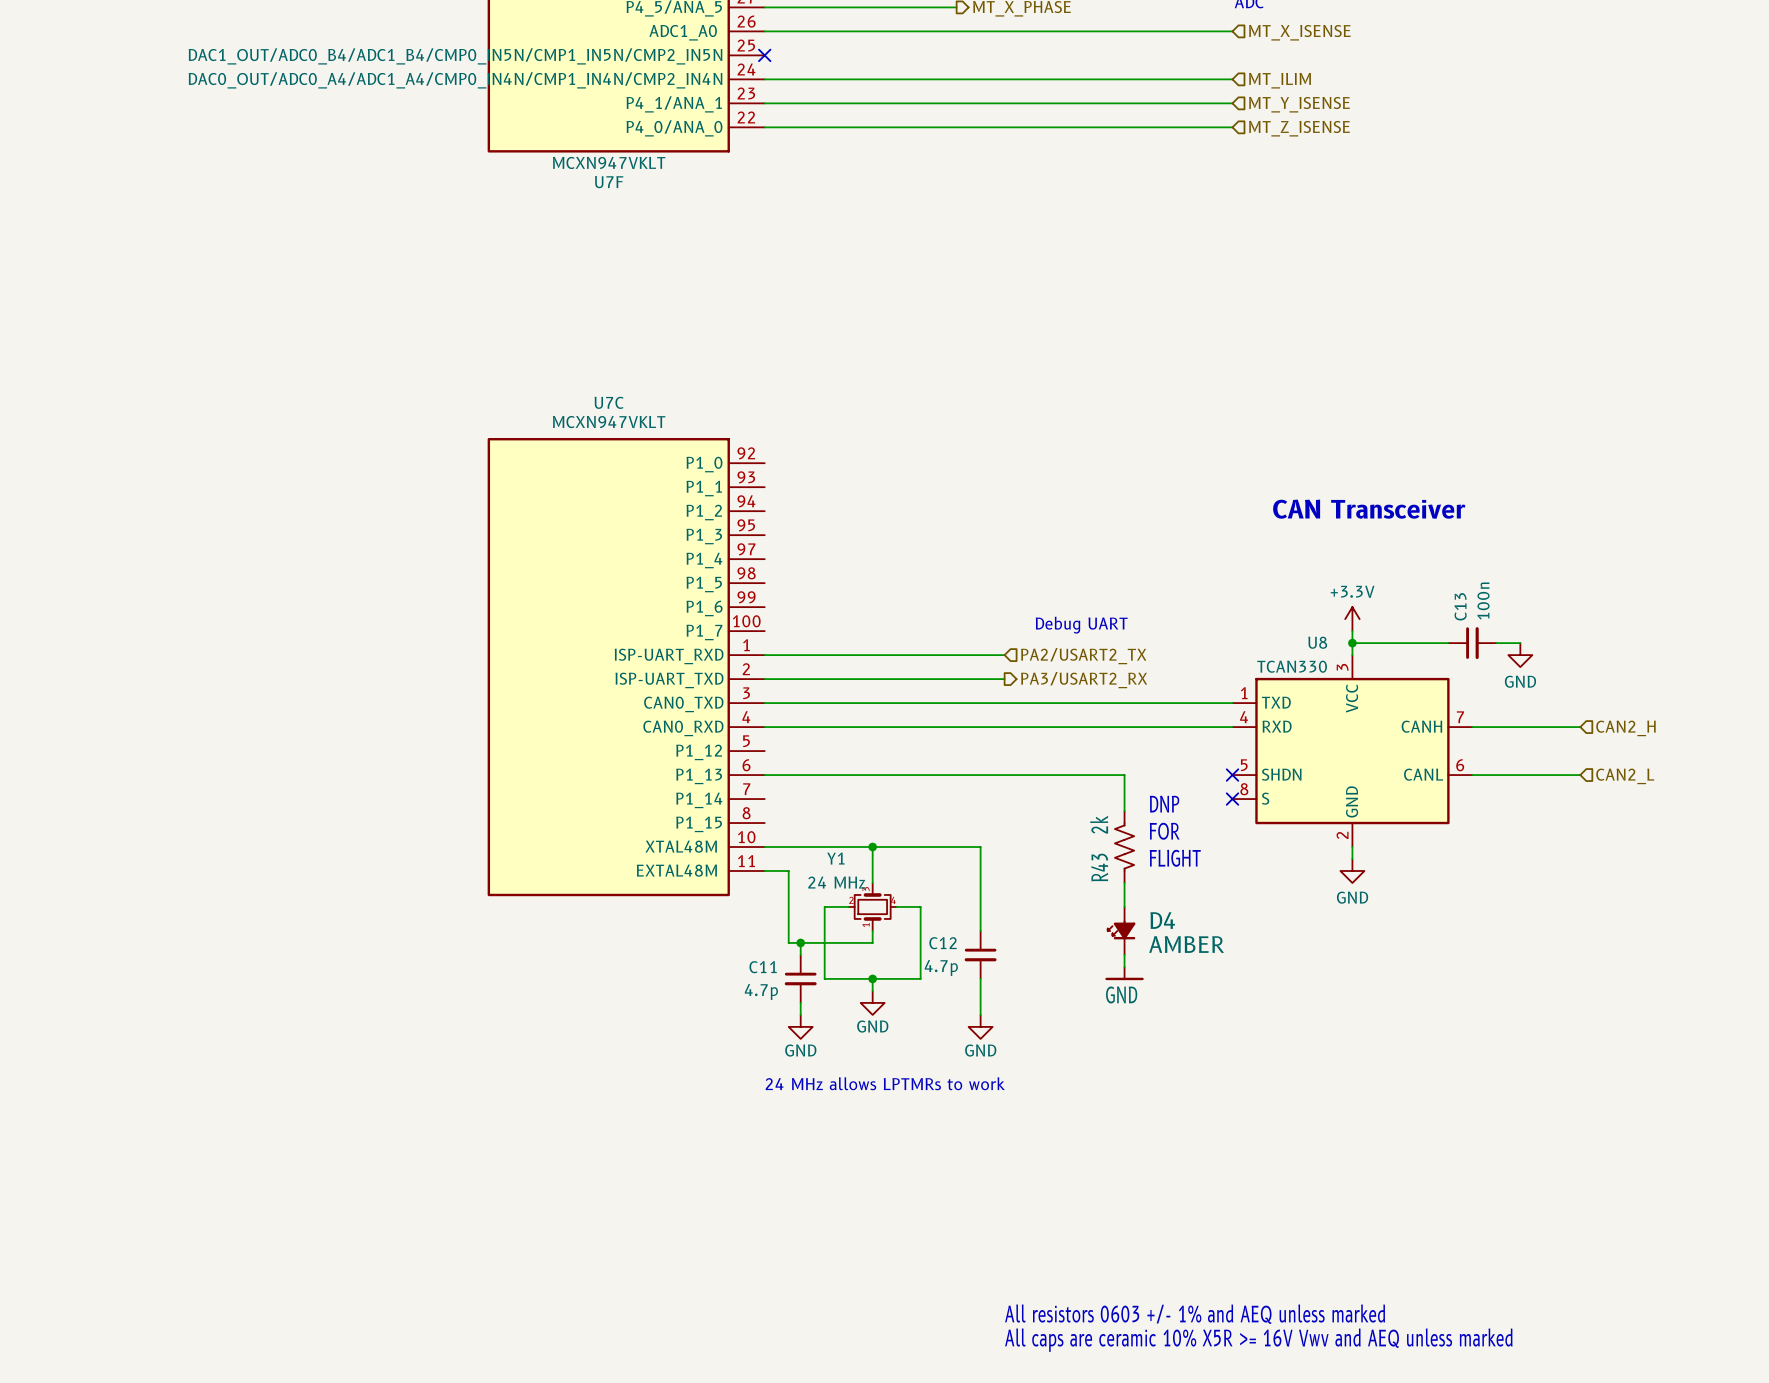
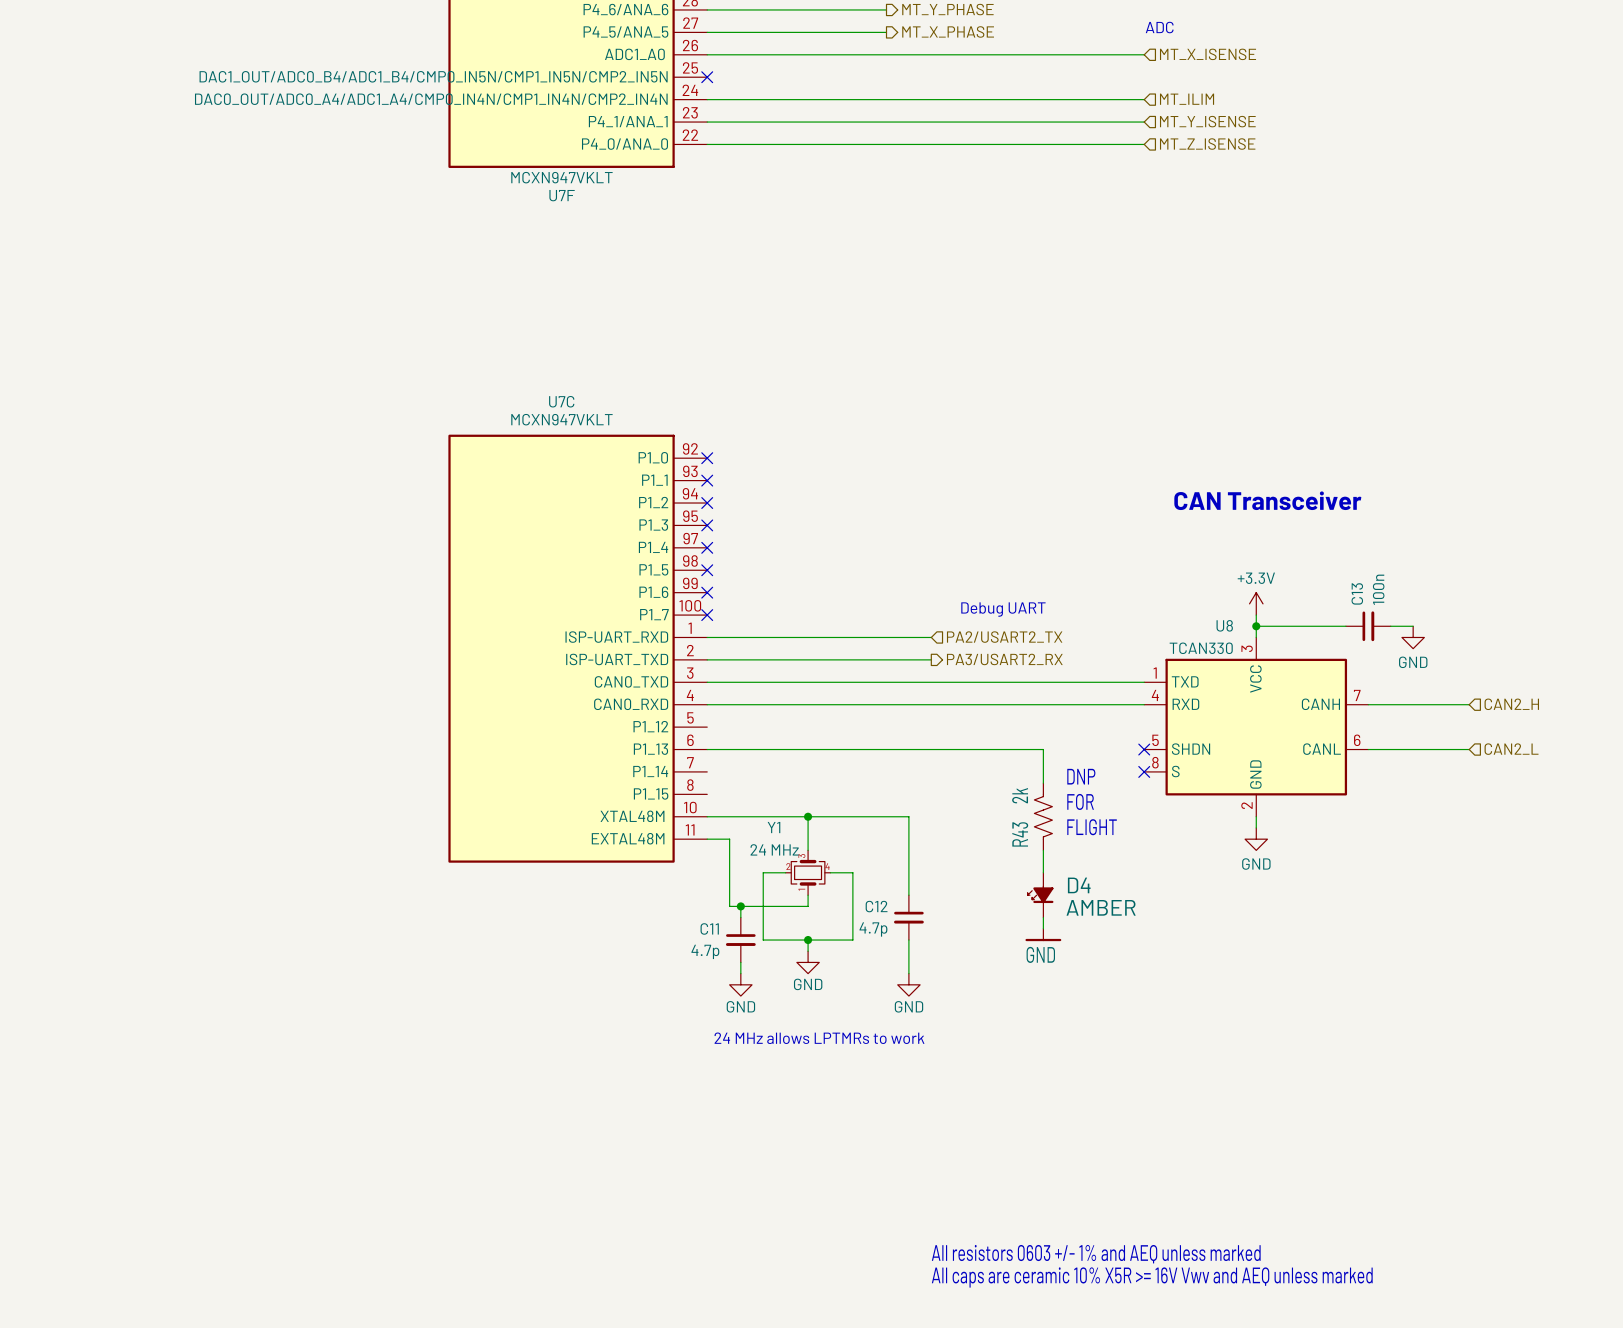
no-connect mark: none -> (707, 458)
no-connect mark: none -> (707, 480)
no-connect mark: none -> (707, 503)
no-connect mark: none -> (707, 525)
no-connect mark: none -> (707, 547)
no-connect mark: none -> (707, 570)
no-connect mark: none -> (707, 592)
no-connect mark: none -> (707, 615)

